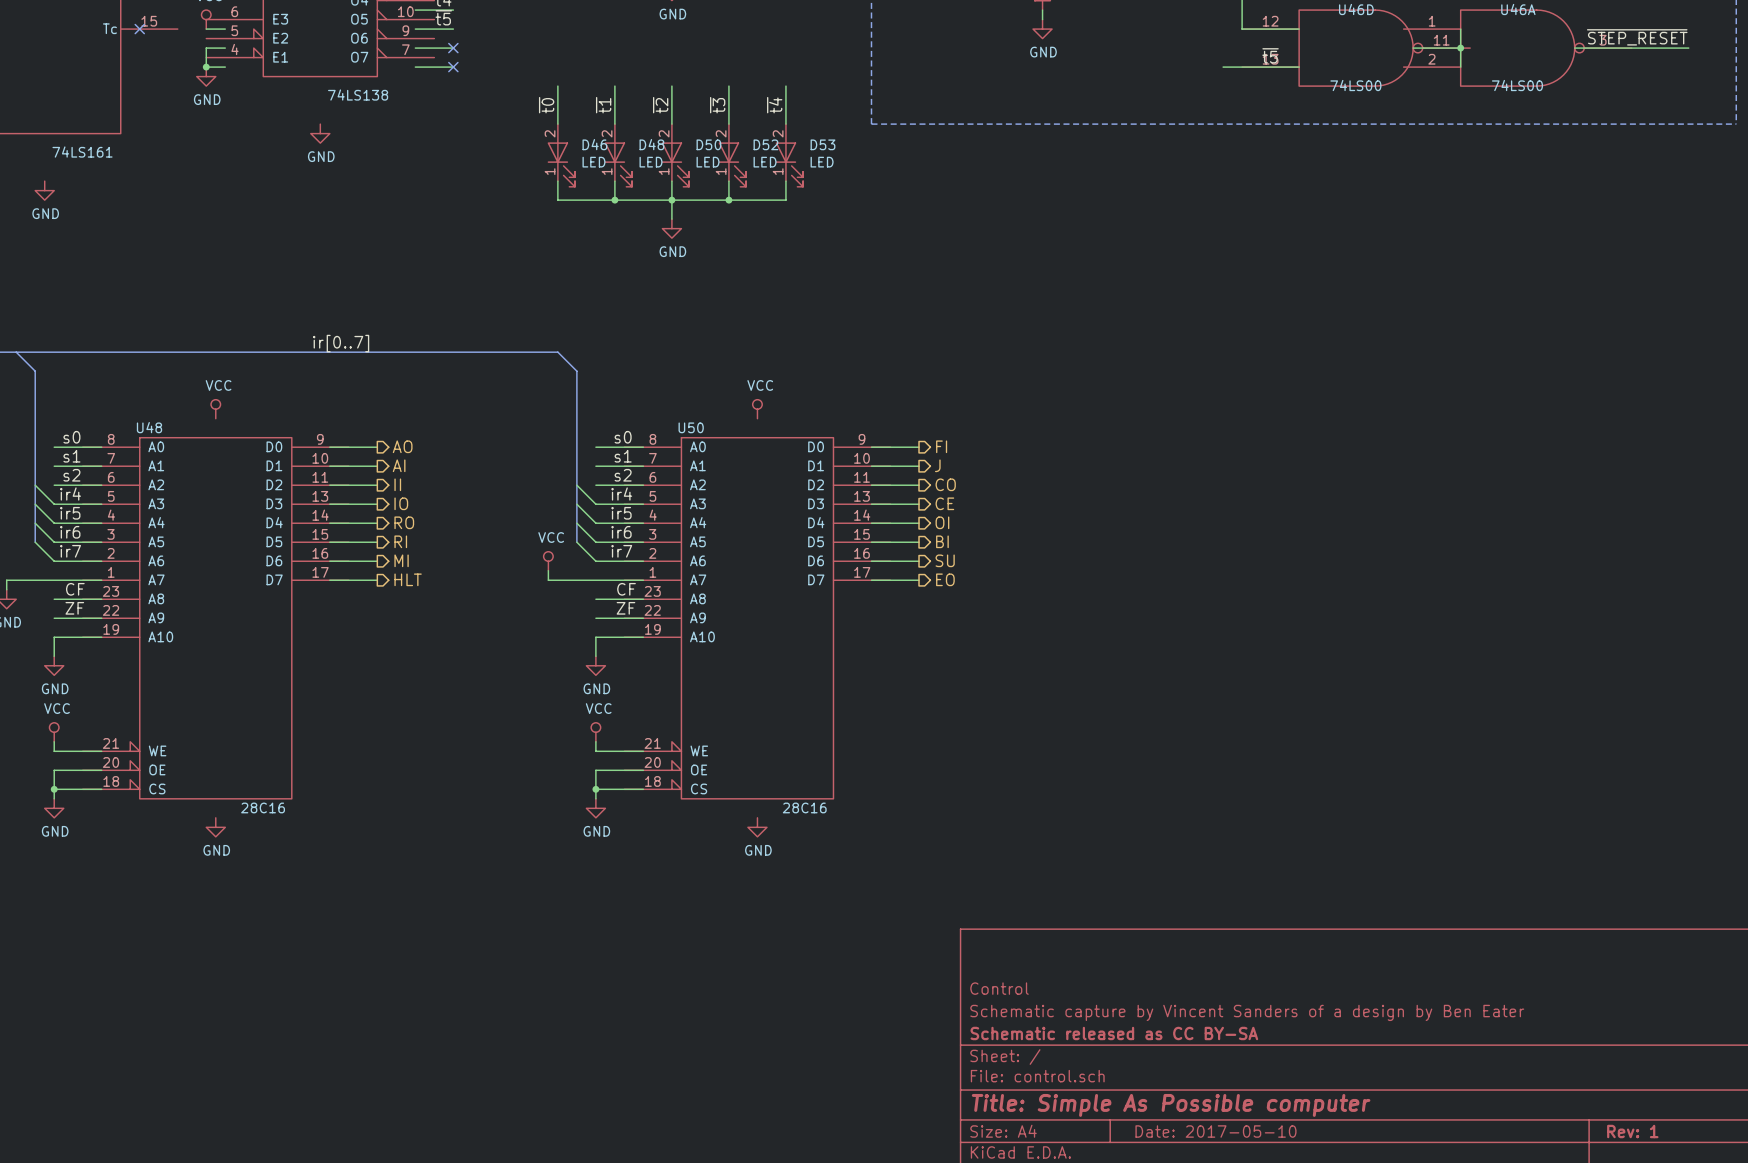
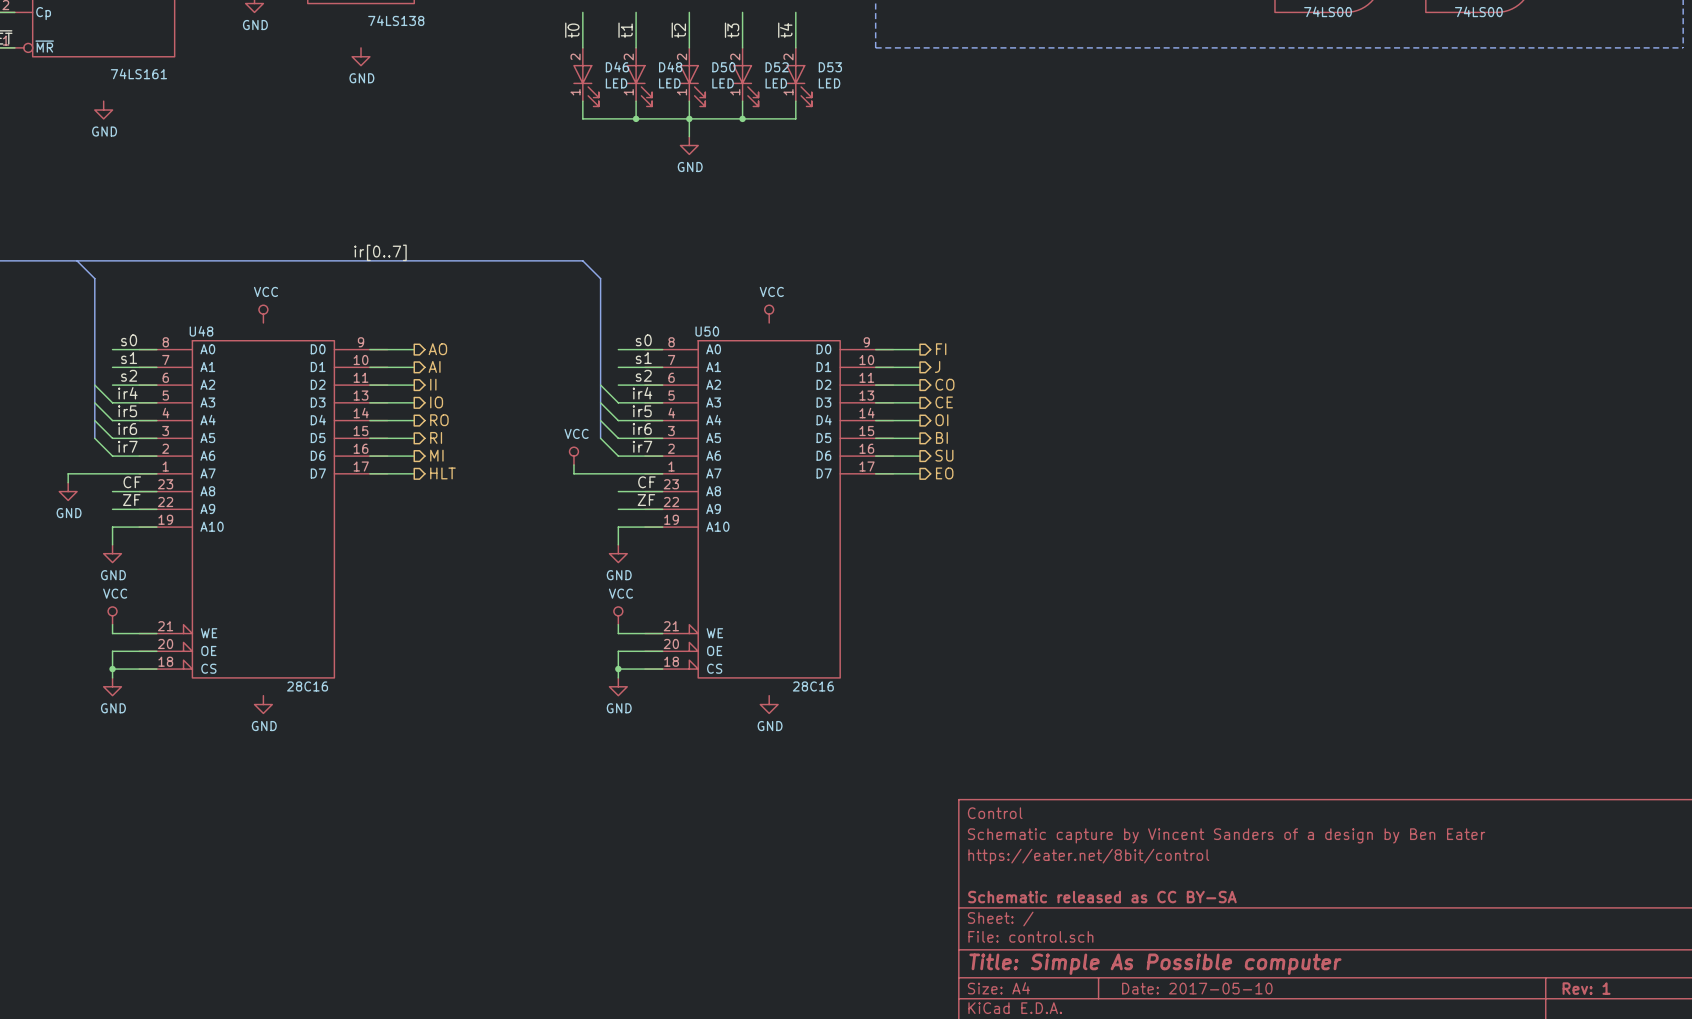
title block: none -> Control (995, 813)
title block: Control (999, 988) -> https://eater.net/8bit/control (1088, 856)
title block position: Schematic capture by Vincent Sanders of a design by Ben Eater (1247, 1012) -> Schematic capture by Vincent Sanders of a design by Ben Eater (1226, 835)

